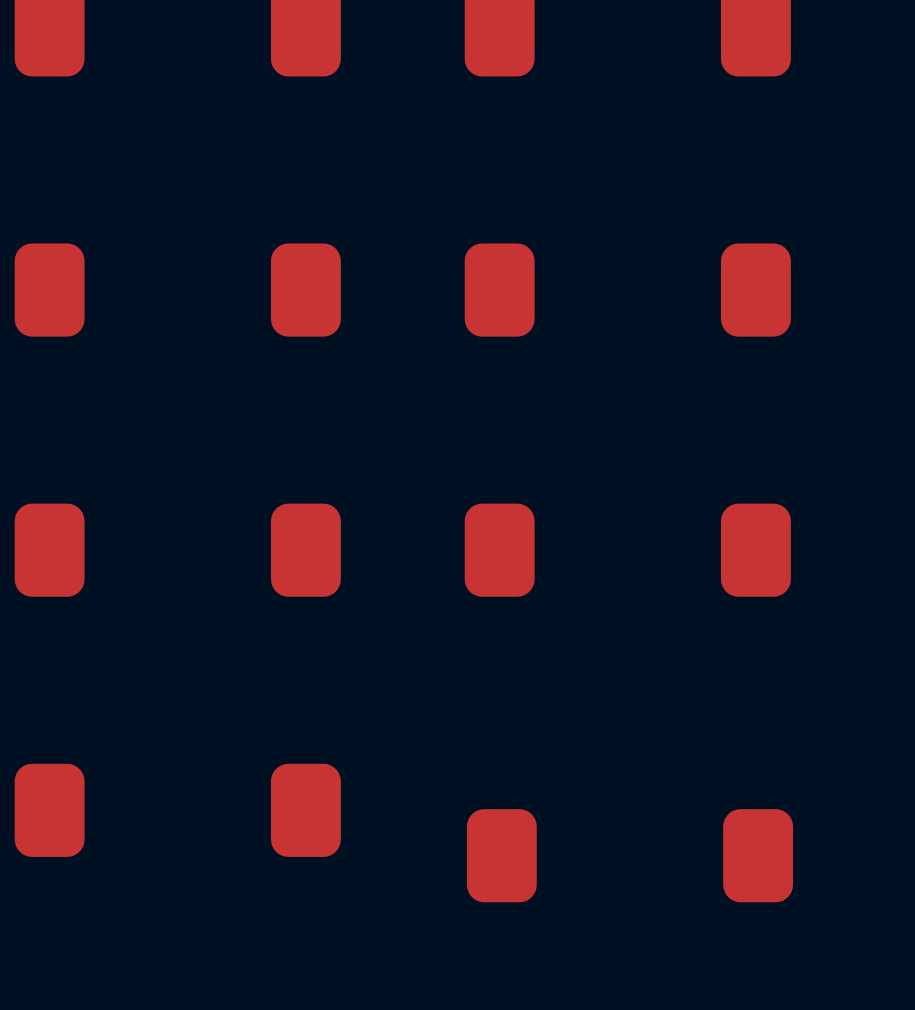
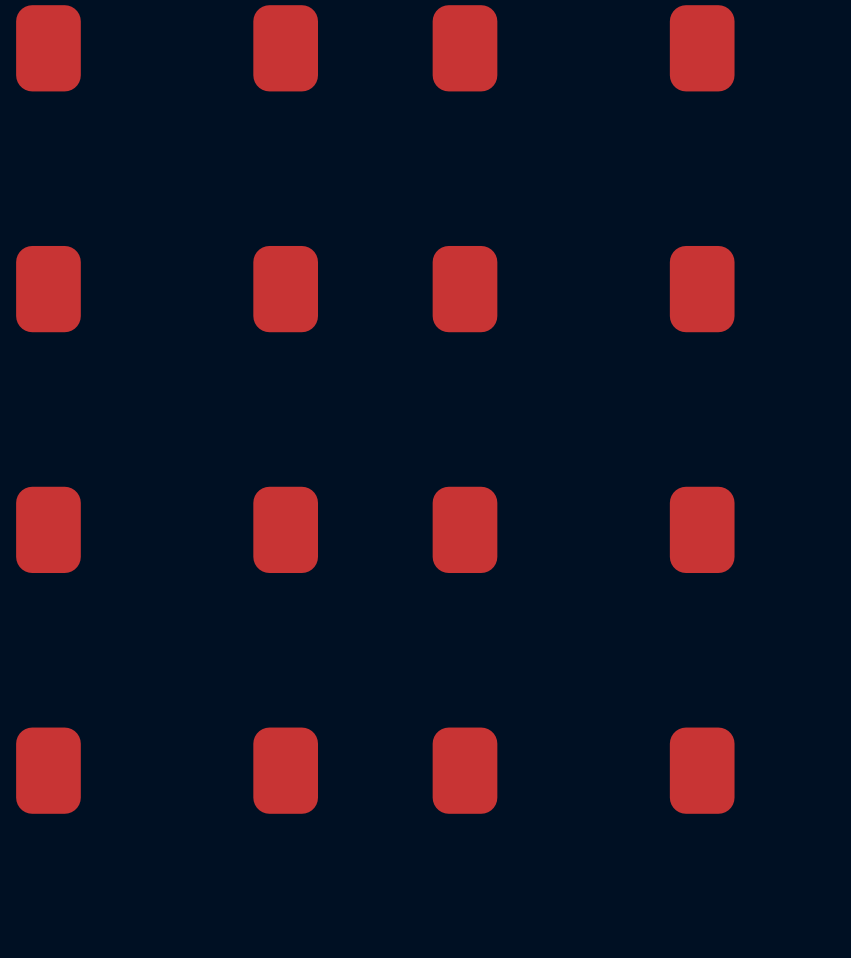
part position: (629, 855) -> (583, 770)

